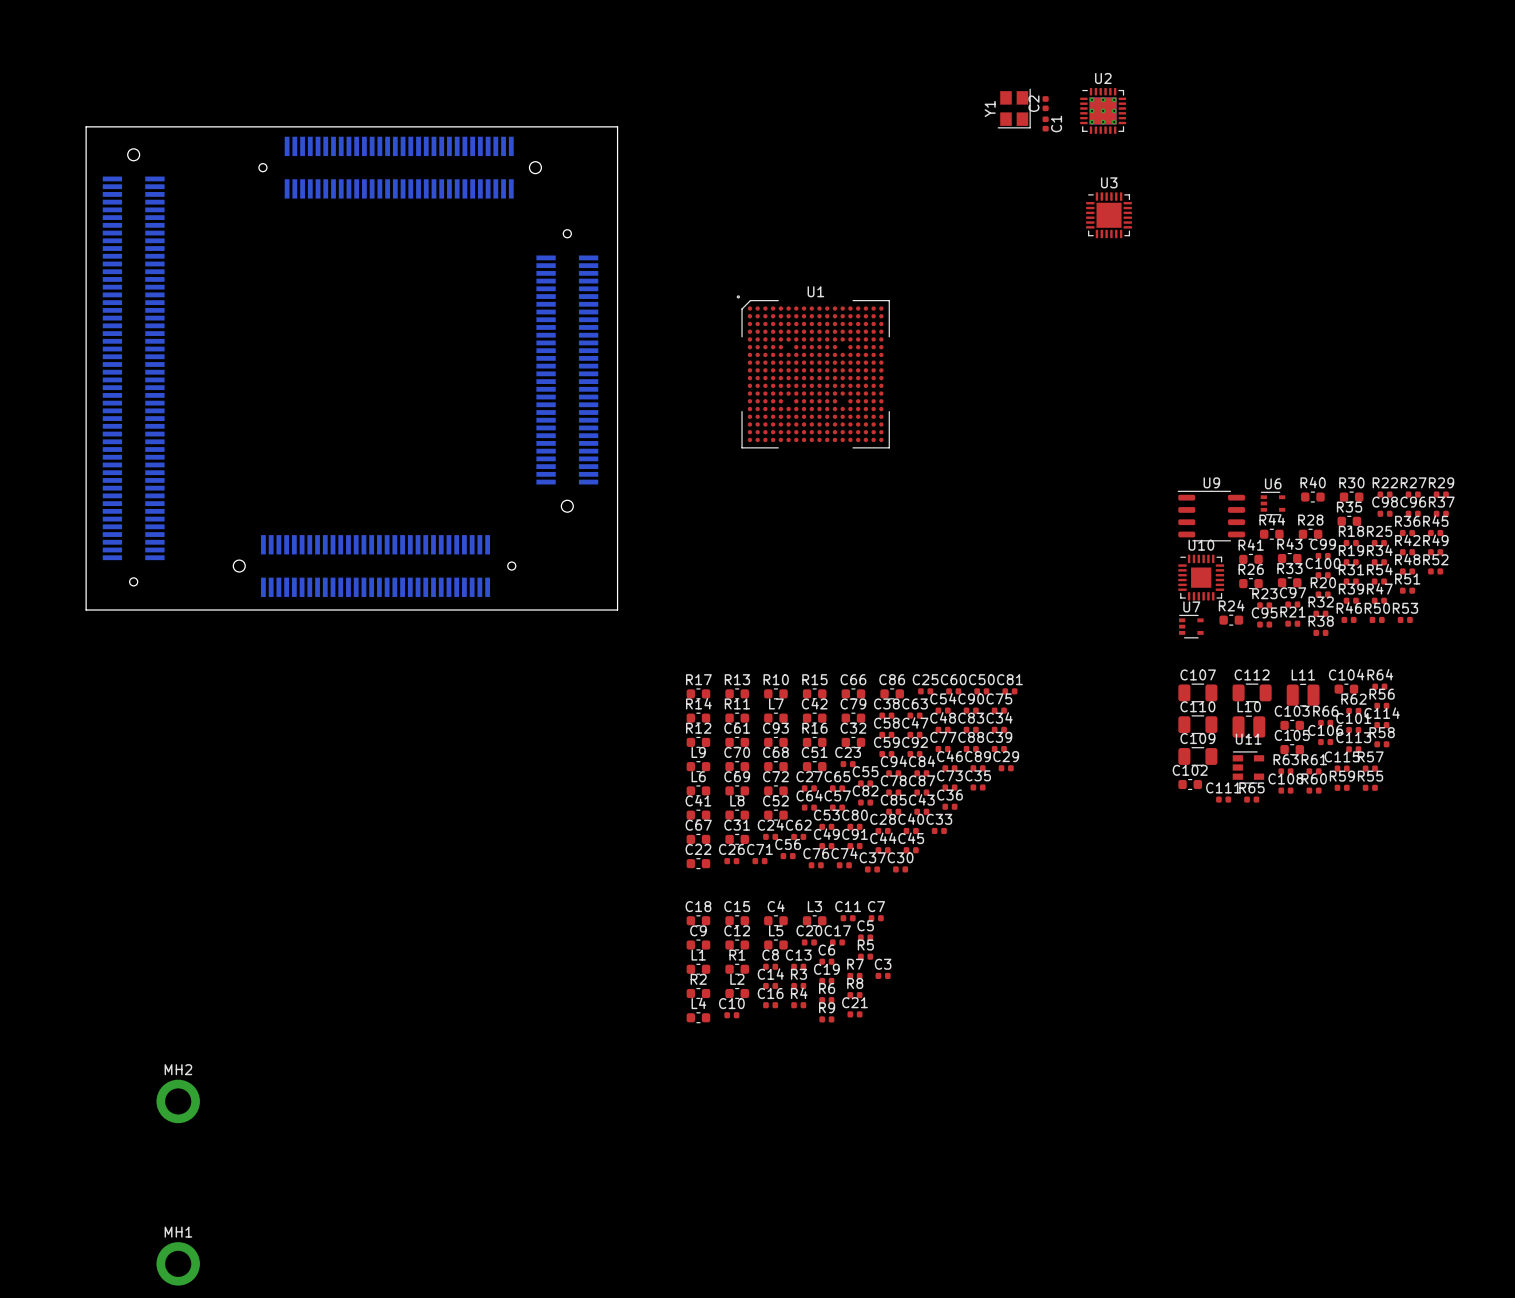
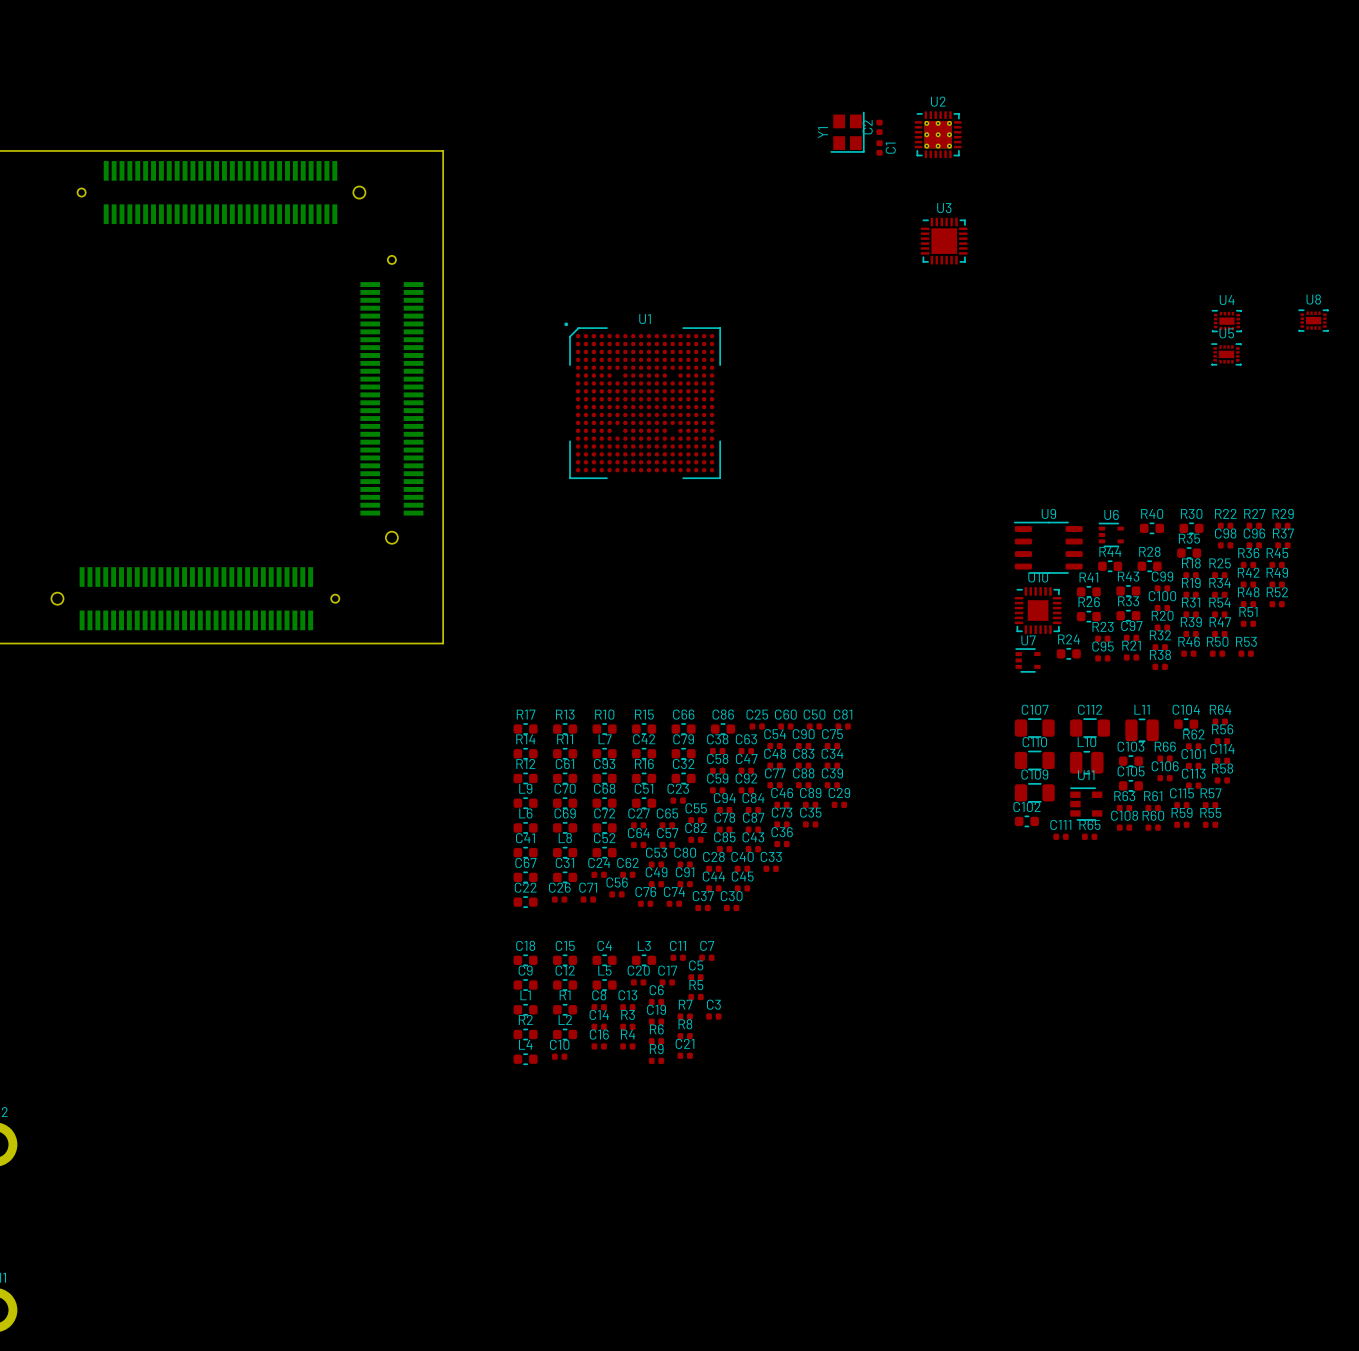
U4: none -> (1226, 321)
U8: none -> (1313, 320)
U5: none -> (1226, 354)

